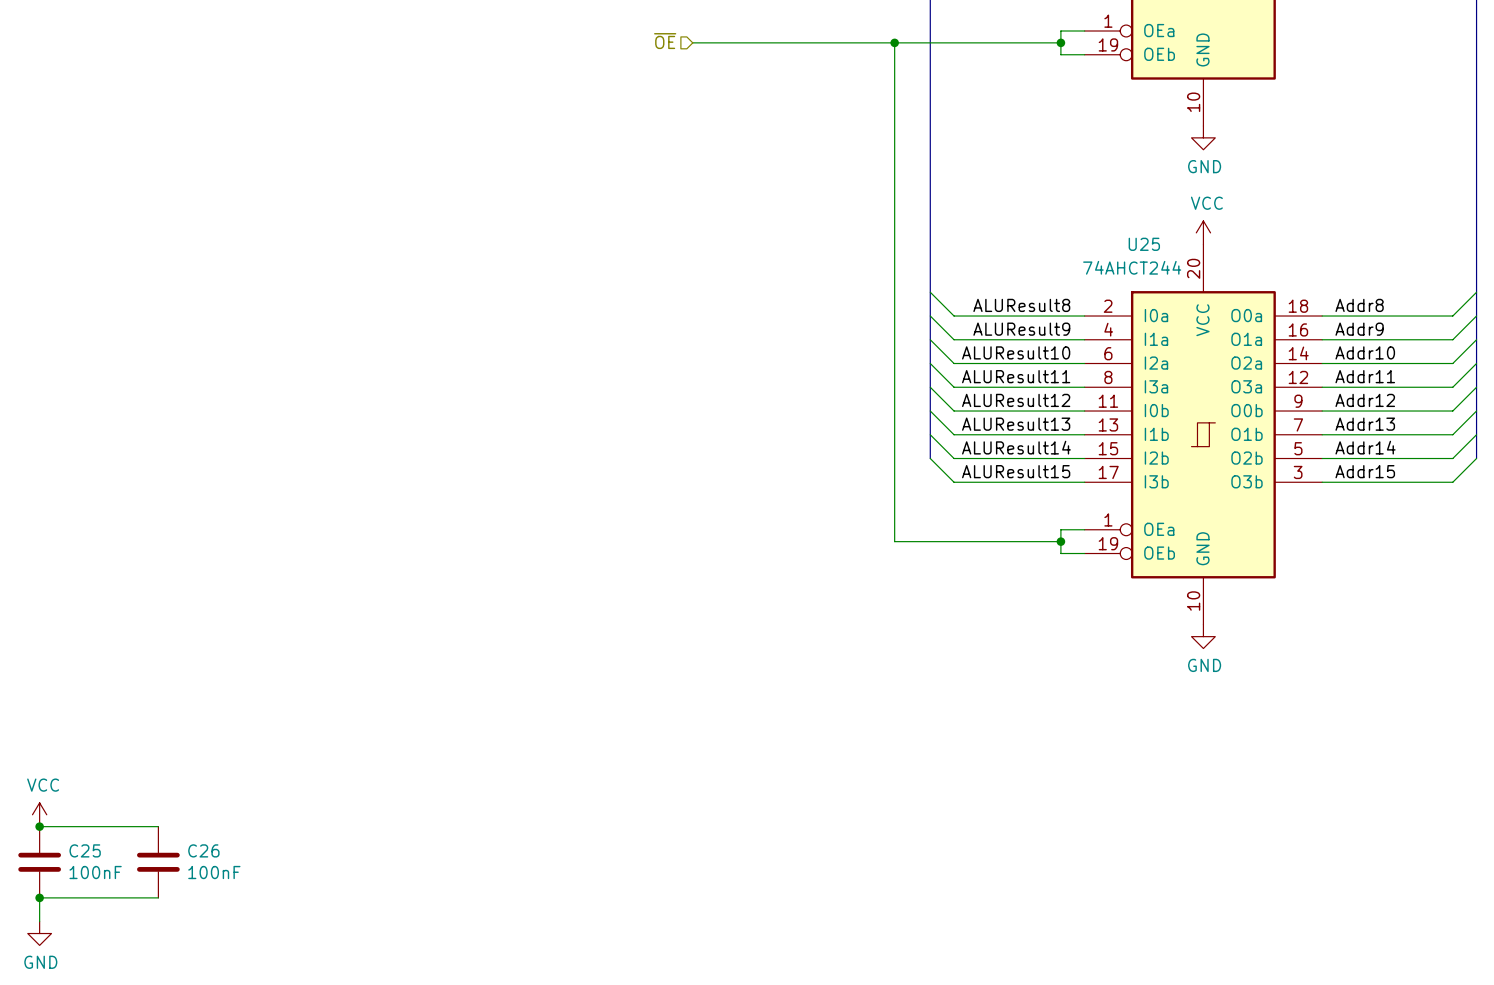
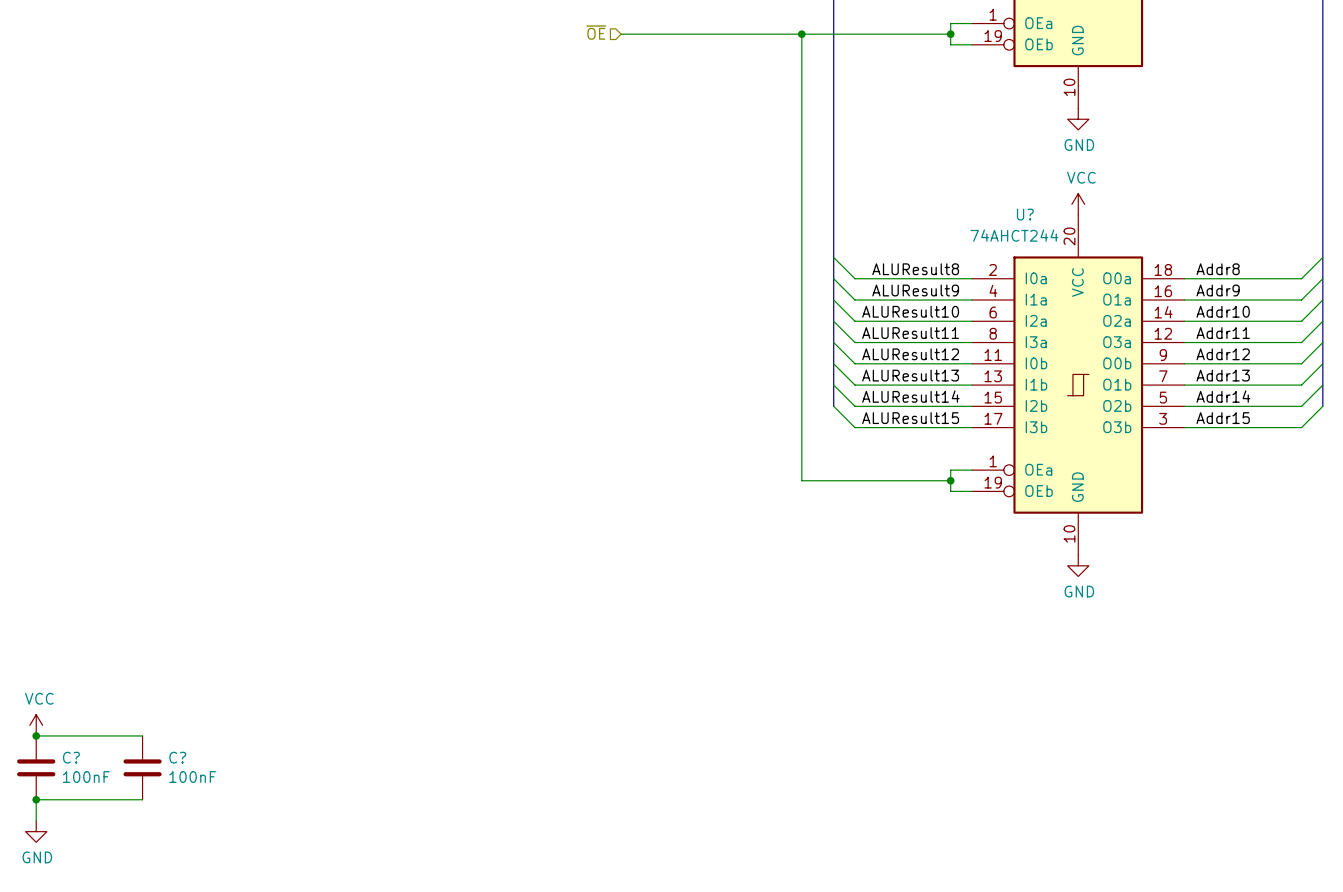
U25 name: U25 (1144, 244) -> U? (1025, 214)
C25 name: C25 (85, 850) -> C? (71, 757)
C26 name: C26 (203, 850) -> C? (177, 757)

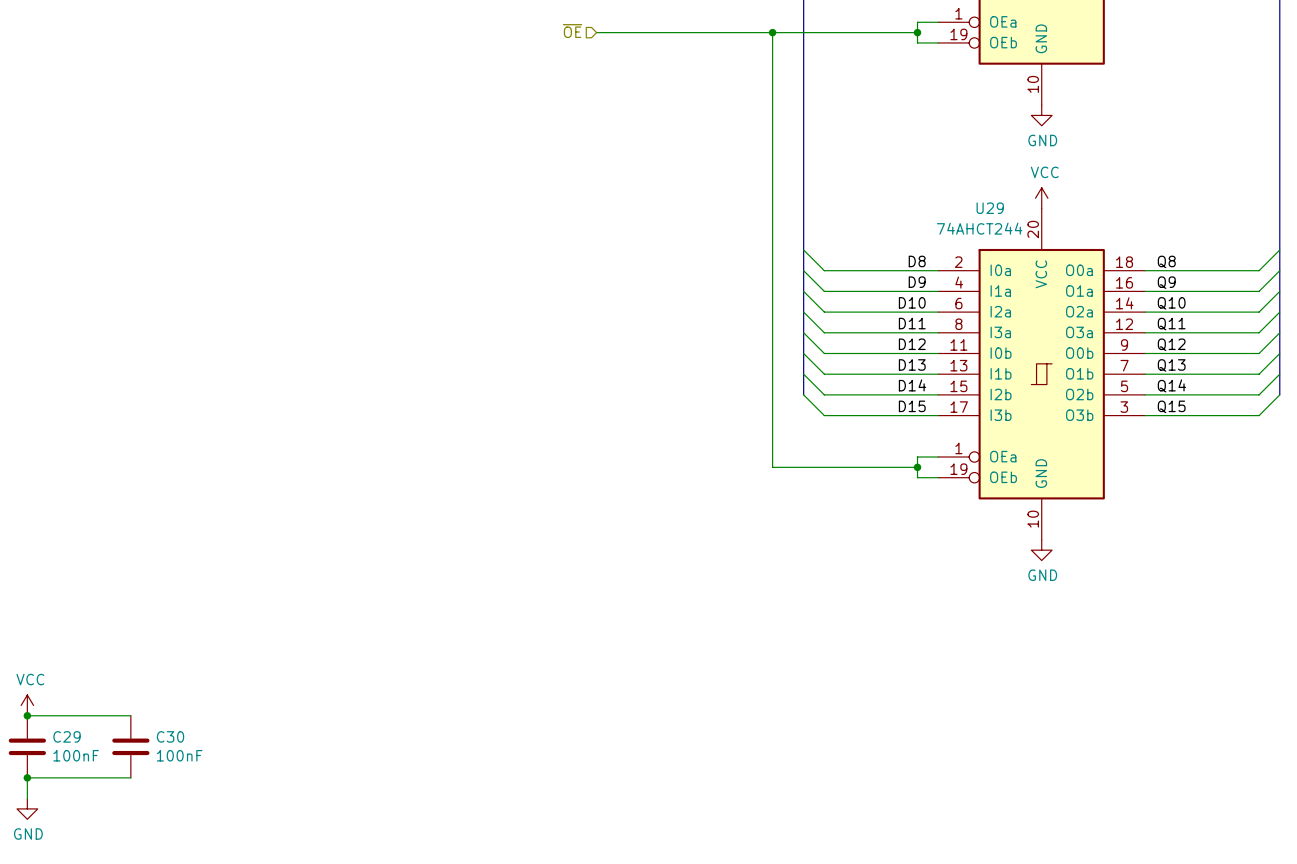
U? name: U? (1025, 214) -> U29 (990, 208)
label: ALUResult8 (915, 269) -> D8 (917, 261)
label: Addr8 (1218, 269) -> Q8 (1166, 261)
label: ALUResult9 (915, 290) -> D9 (917, 282)
label: Addr9 (1218, 290) -> Q9 (1166, 282)
label: ALUResult10 (910, 311) -> D10 (912, 302)
label: Addr10 (1223, 311) -> Q10 (1171, 303)
label: ALUResult11 (910, 333) -> D11 (912, 323)
label: Addr11 (1223, 333) -> Q11 (1171, 324)
label: ALUResult12 (910, 354) -> D12 (912, 344)
label: Addr12 (1223, 354) -> Q12 (1171, 344)
label: ALUResult13 (910, 375) -> D13 (912, 364)
label: Addr13 (1223, 375) -> Q13 (1171, 365)
label: ALUResult14 (910, 396) -> D14 (912, 385)
label: Addr14 (1223, 396) -> Q14 (1171, 385)
label: ALUResult15 (910, 418) -> D15 (912, 406)
label: Addr15 (1223, 418) -> Q15 (1171, 406)
C? name: C? (71, 757) -> C29 (67, 736)
C? name: C? (177, 757) -> C30 (170, 736)

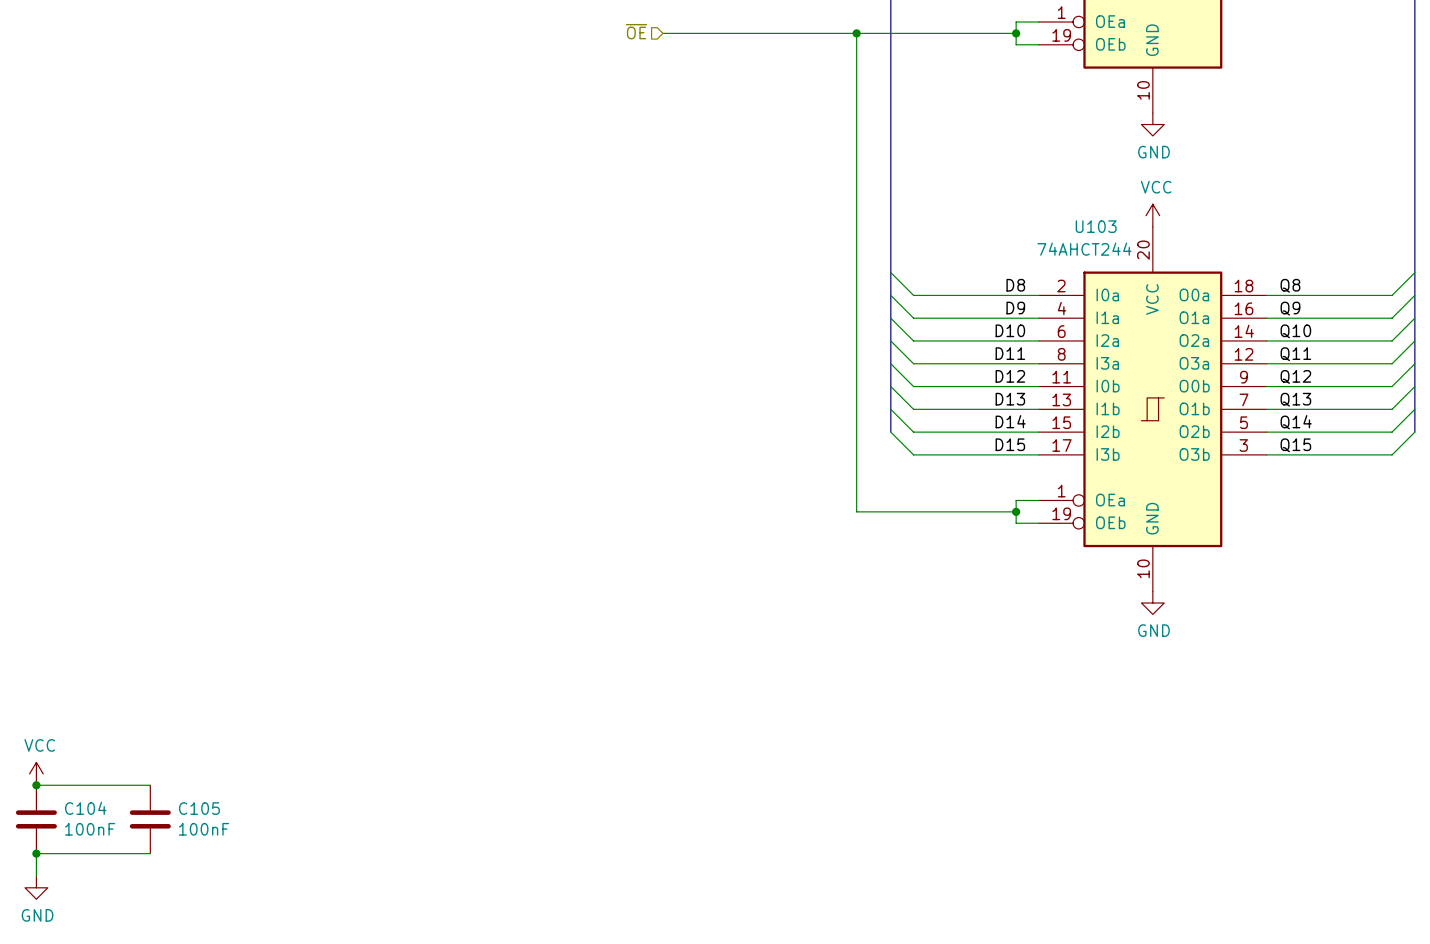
U29 name: U29 (990, 208) -> U103 (1096, 226)
C29 name: C29 (67, 736) -> C104 (85, 808)
C30 name: C30 (170, 736) -> C105 (199, 808)

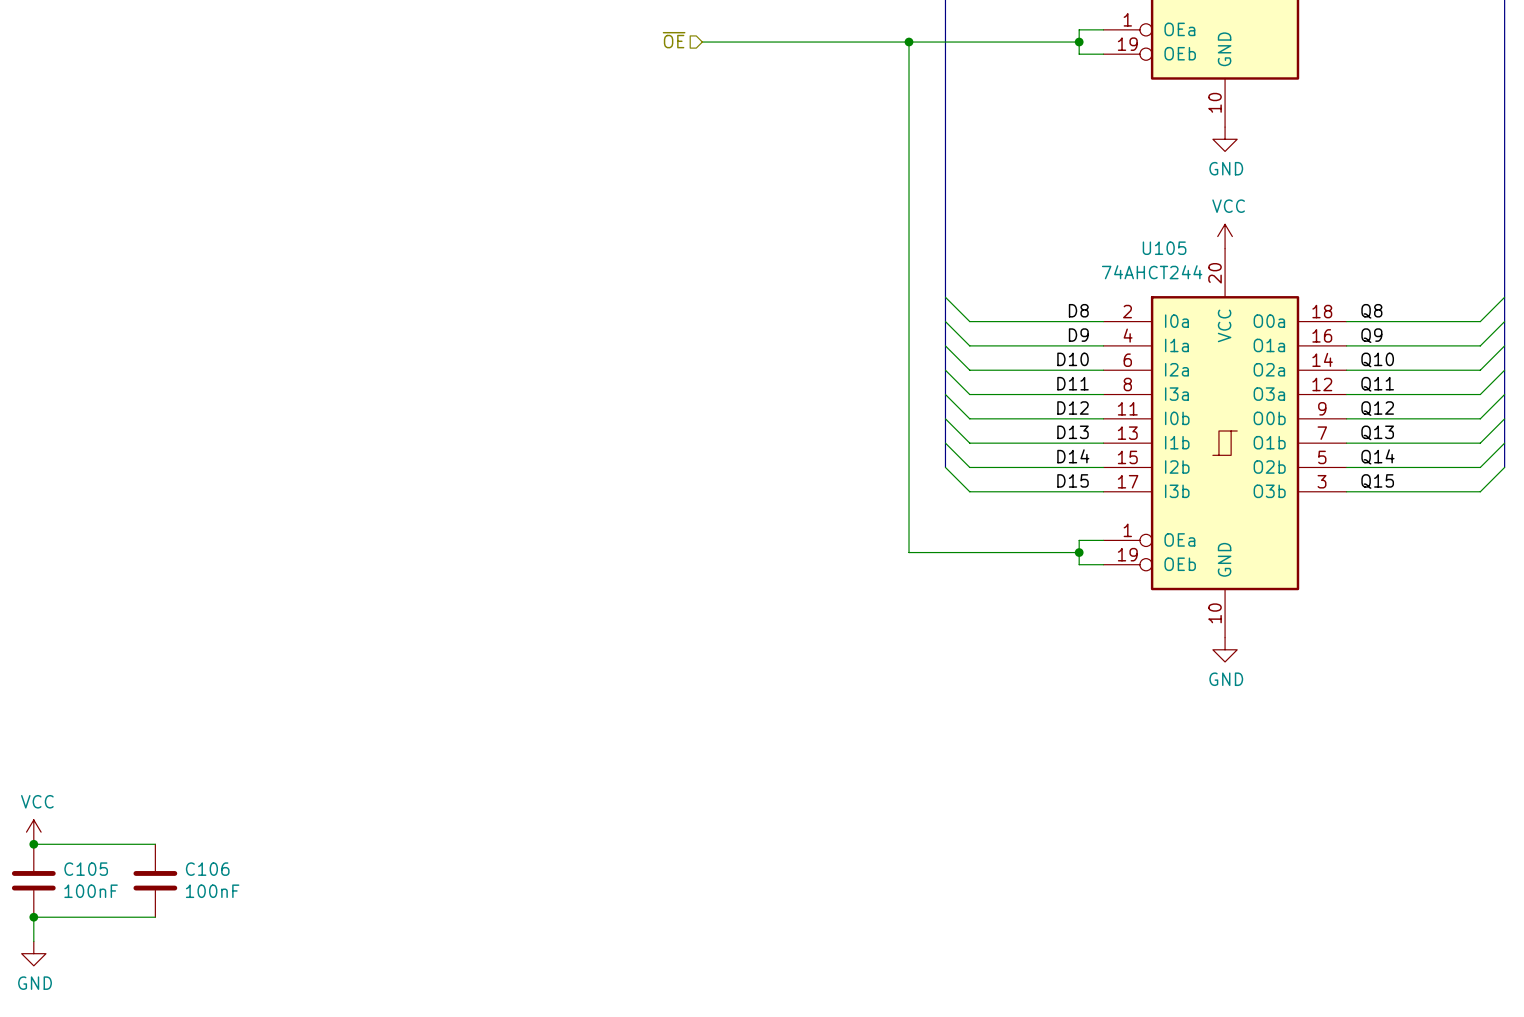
U103 name: U103 (1096, 226) -> U105 (1164, 248)
C104 name: C104 (85, 808) -> C105 (86, 869)
C105 name: C105 (199, 808) -> C106 (207, 869)

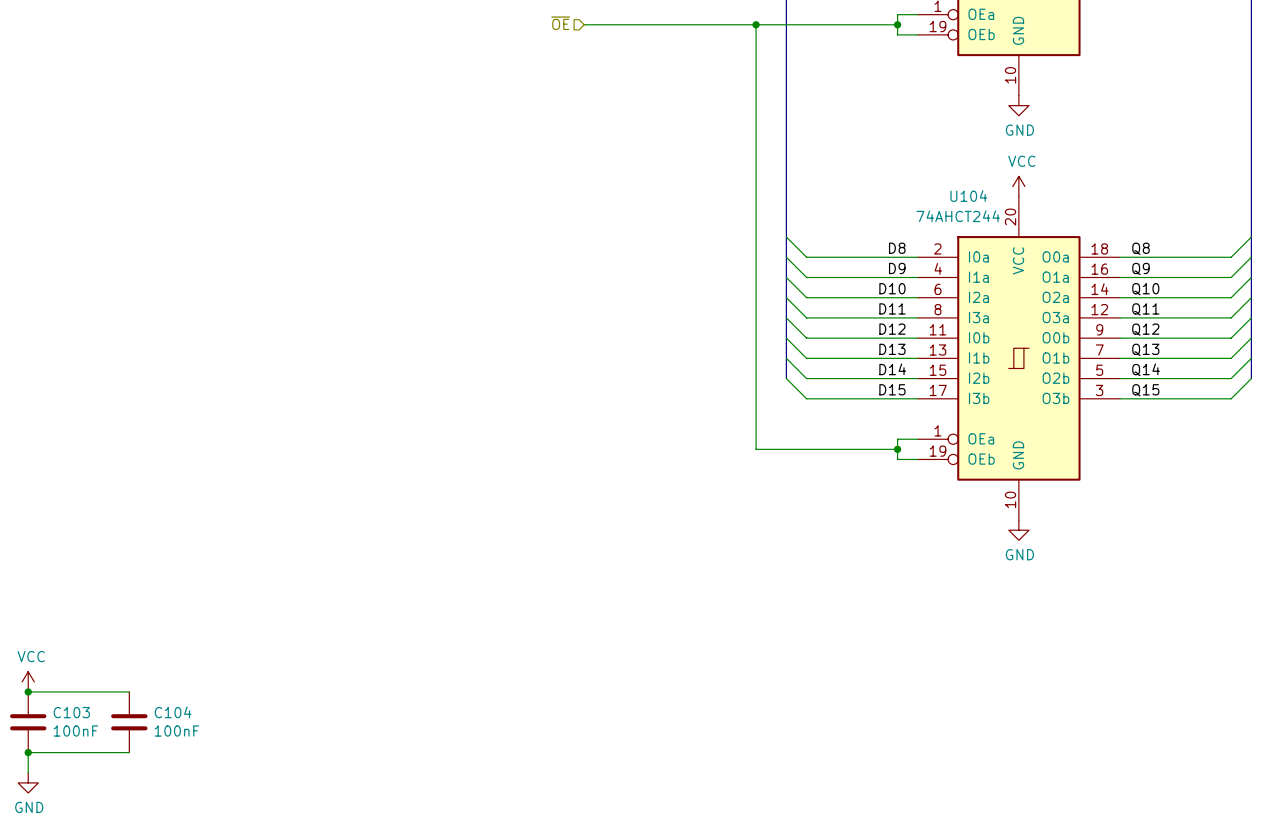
U105 name: U105 (1164, 248) -> U104 (968, 196)
C105 name: C105 (86, 869) -> C103 (71, 712)
C106 name: C106 (207, 869) -> C104 (173, 712)

